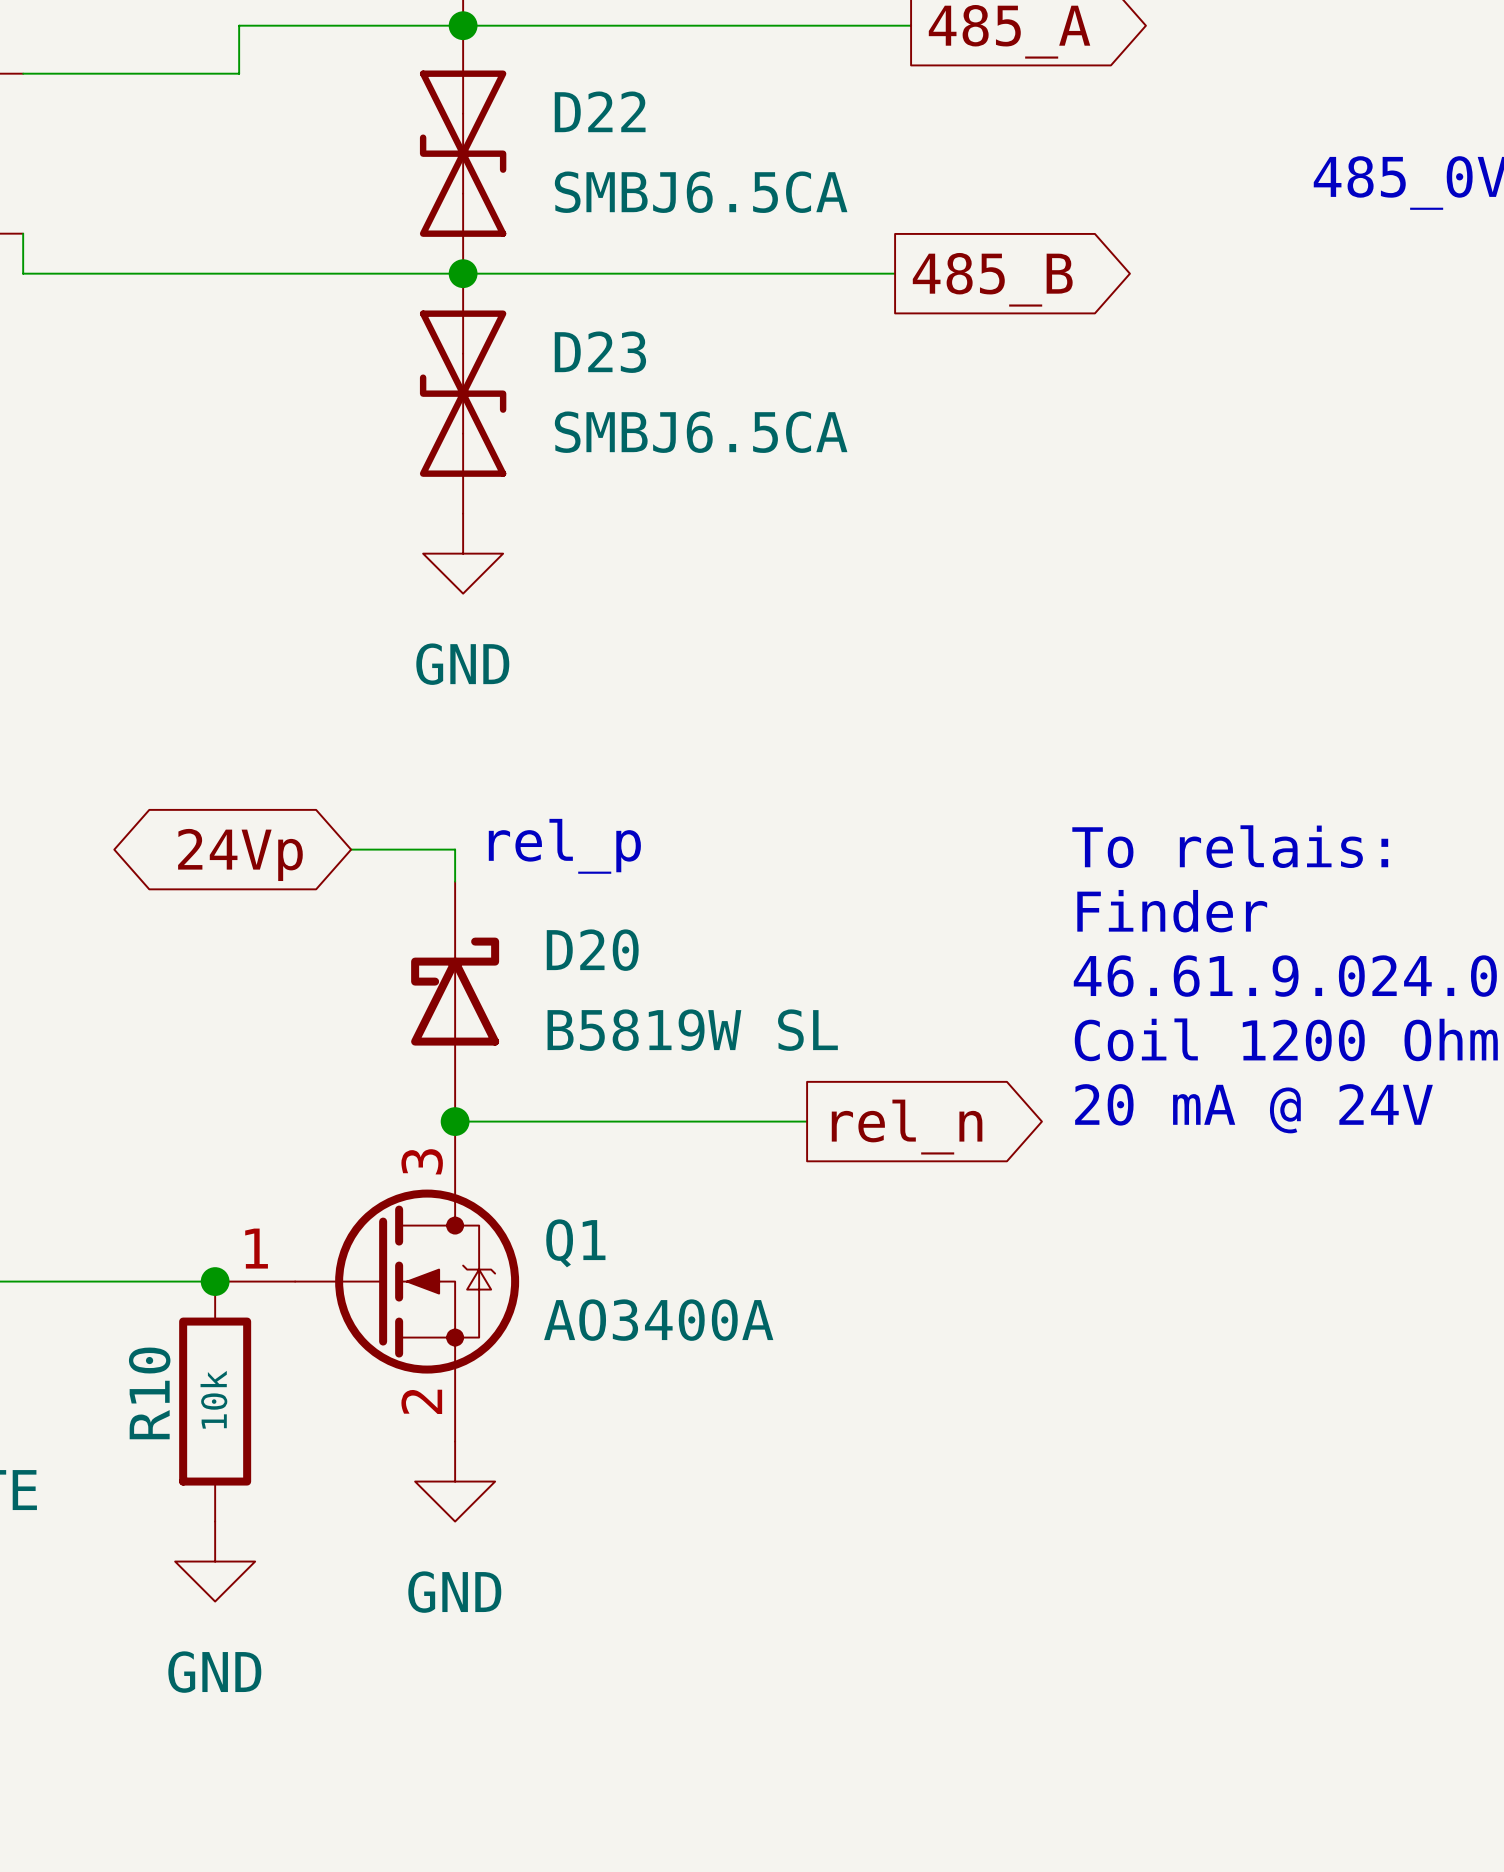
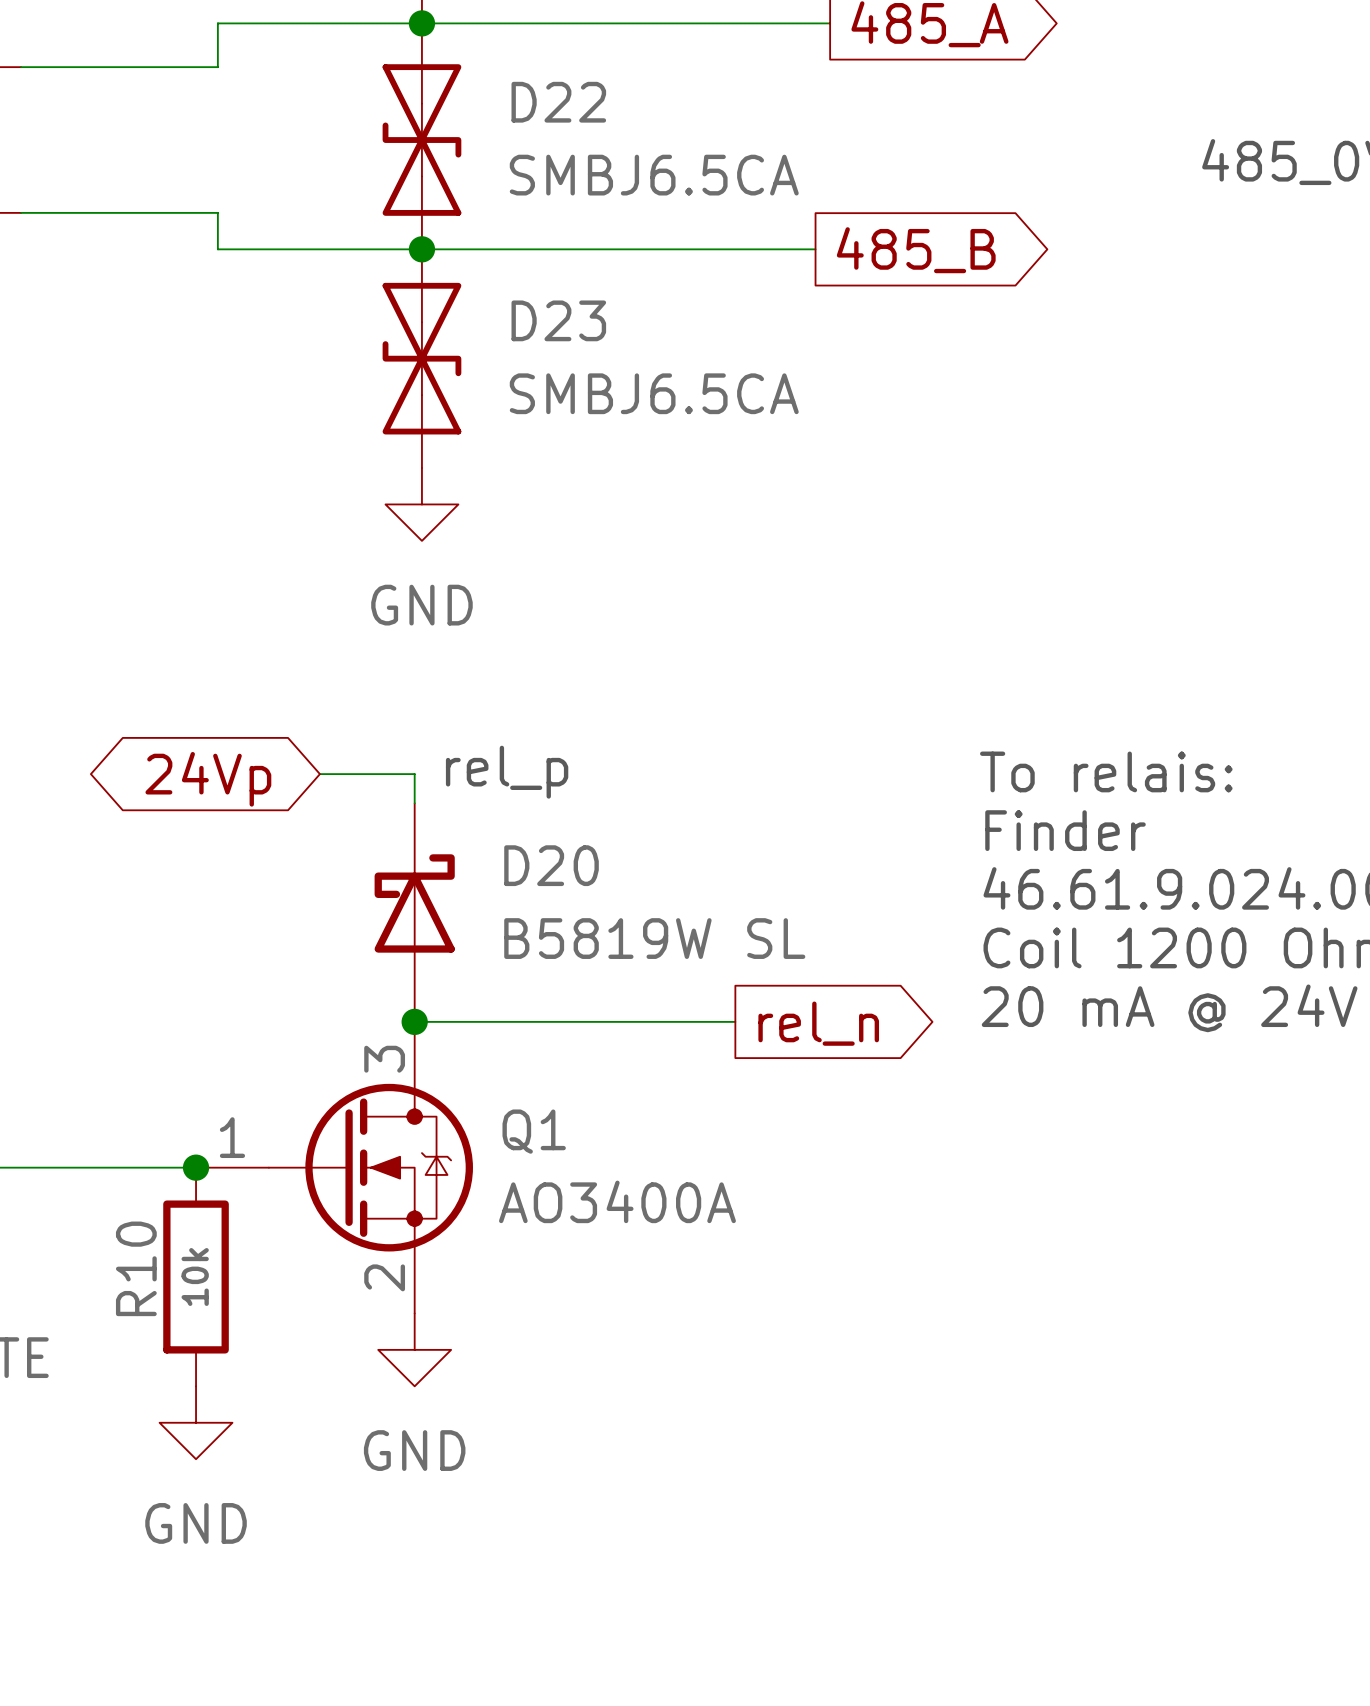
wire: (23, 233) (23, 273) (239, 273) -> (21, 212) (217, 212) (217, 249)

